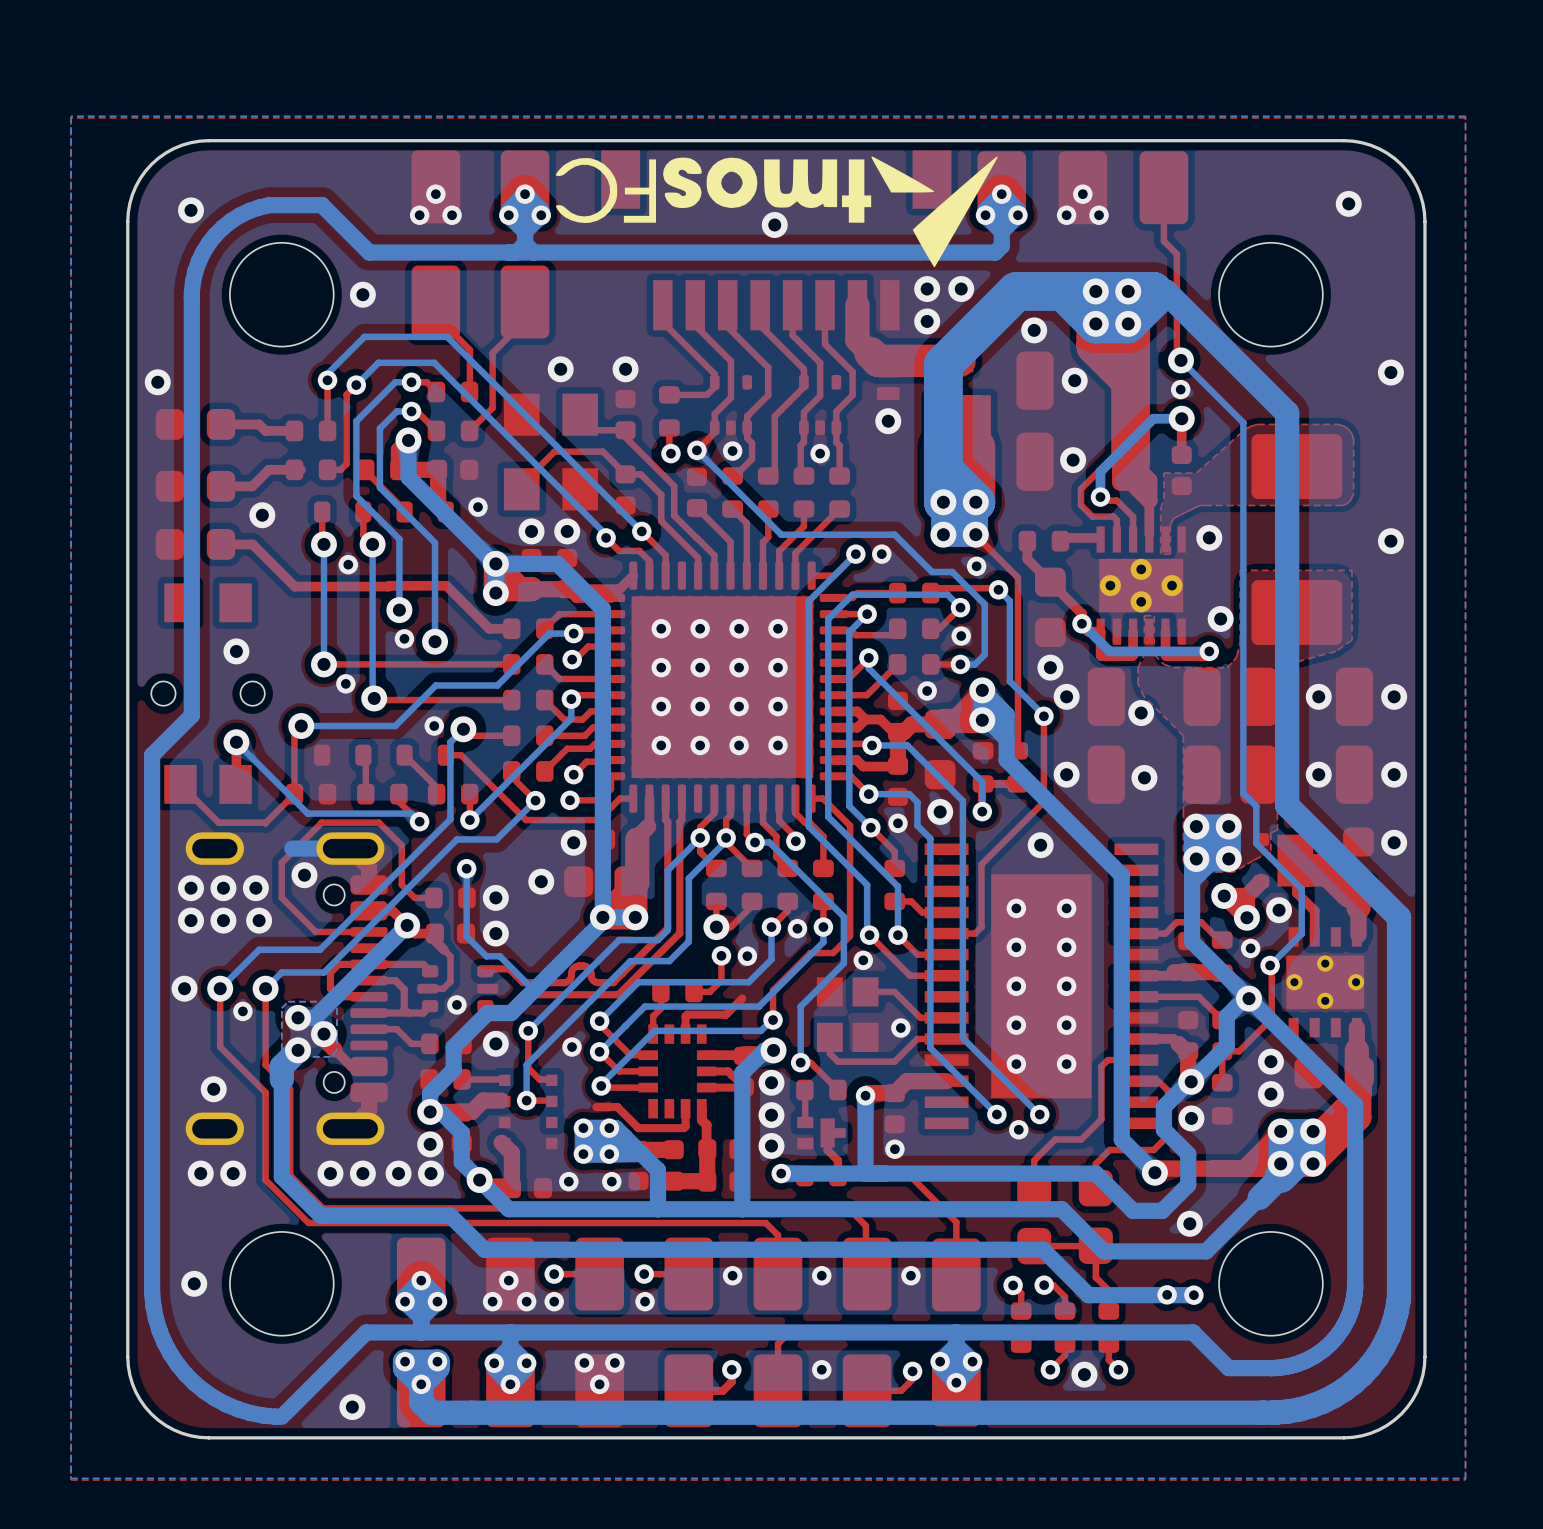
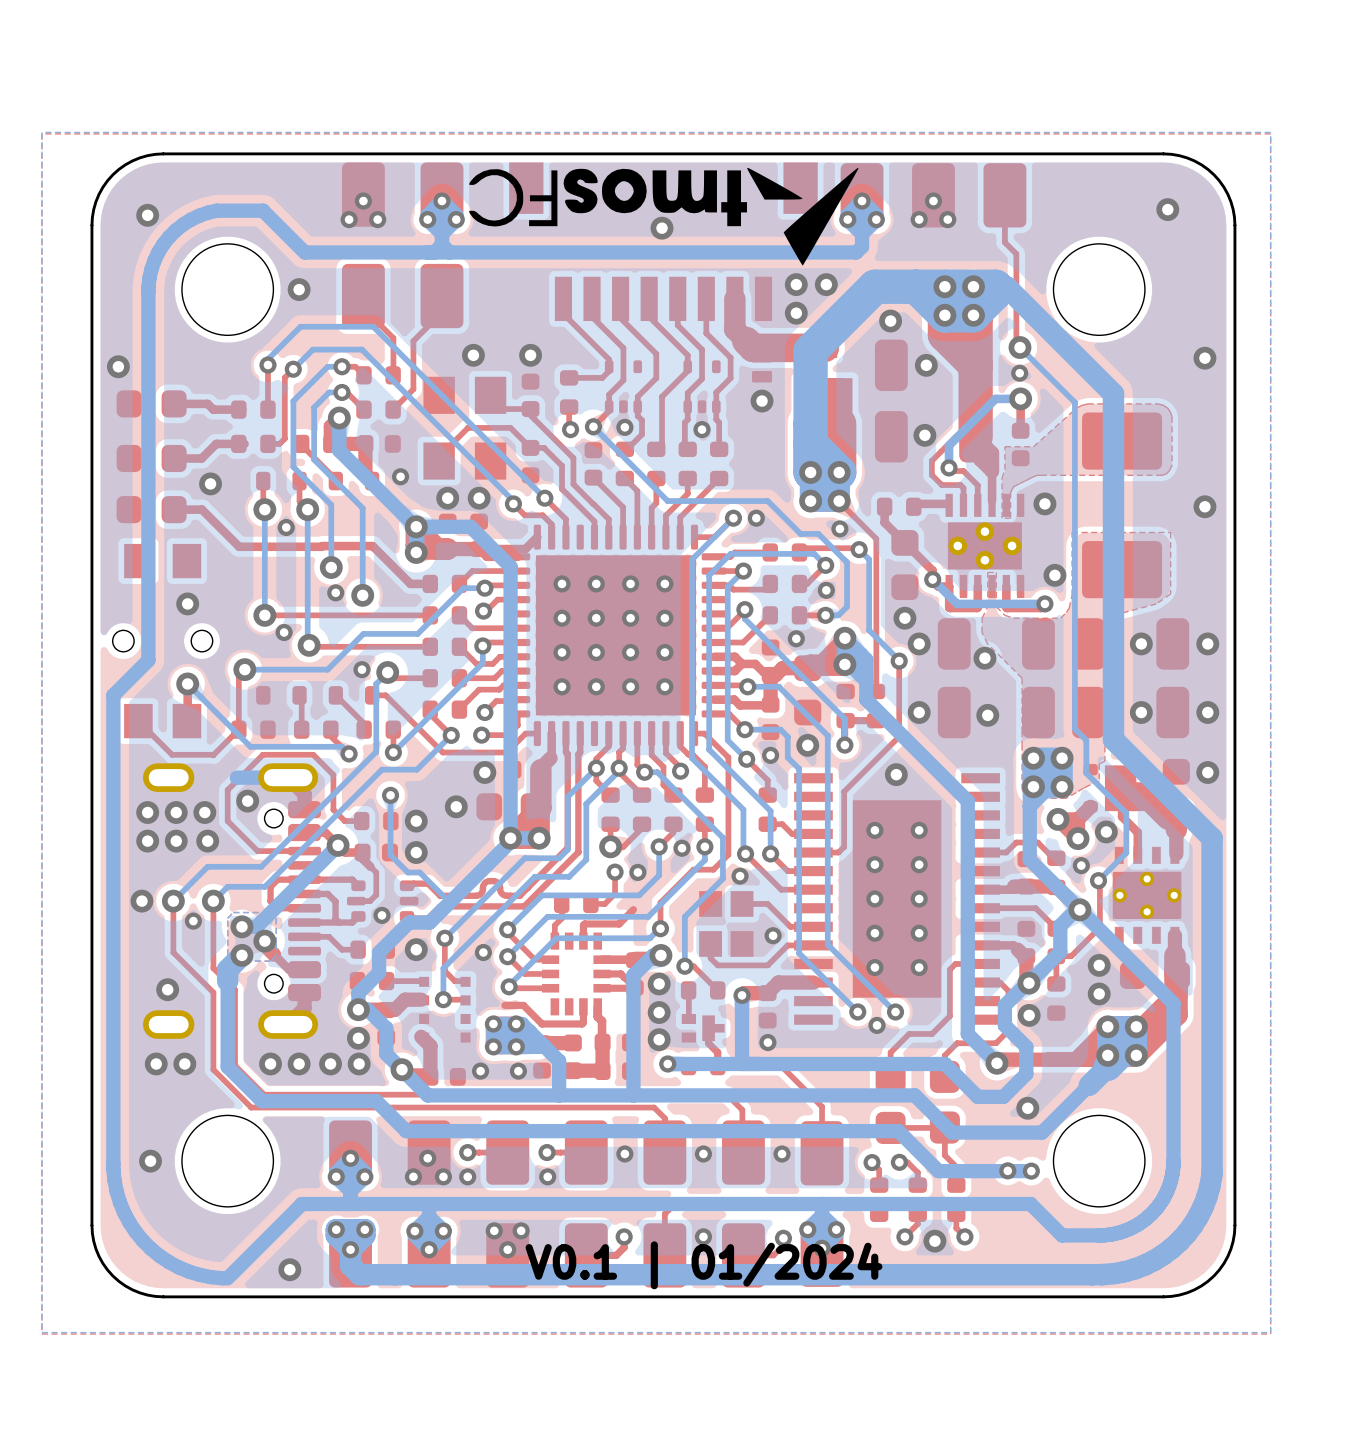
text: none -> V0.1 | 01/2024 (703, 1265)

